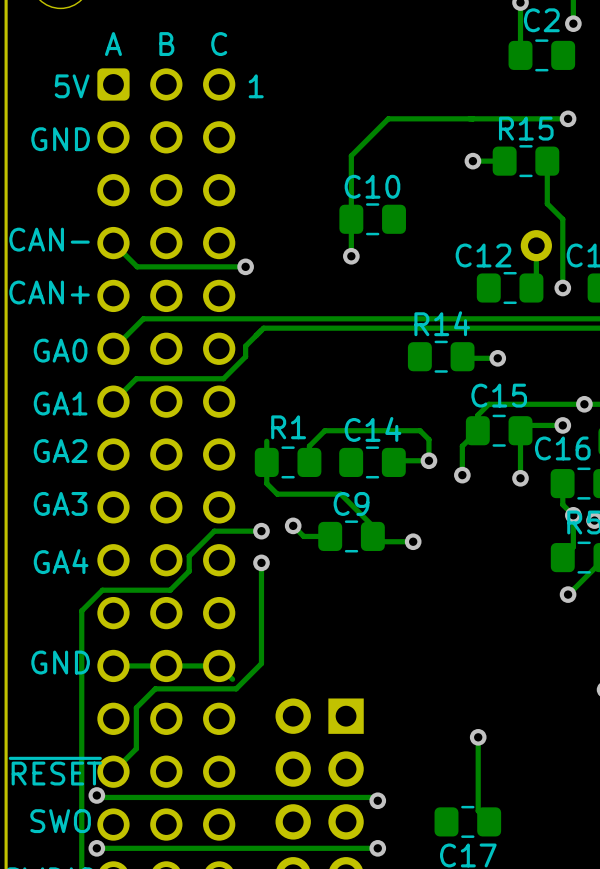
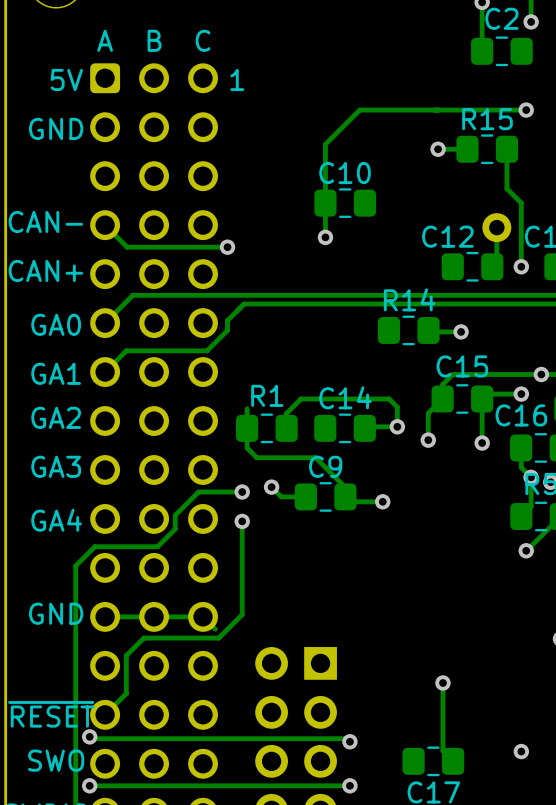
via: none -> (521, 751)

